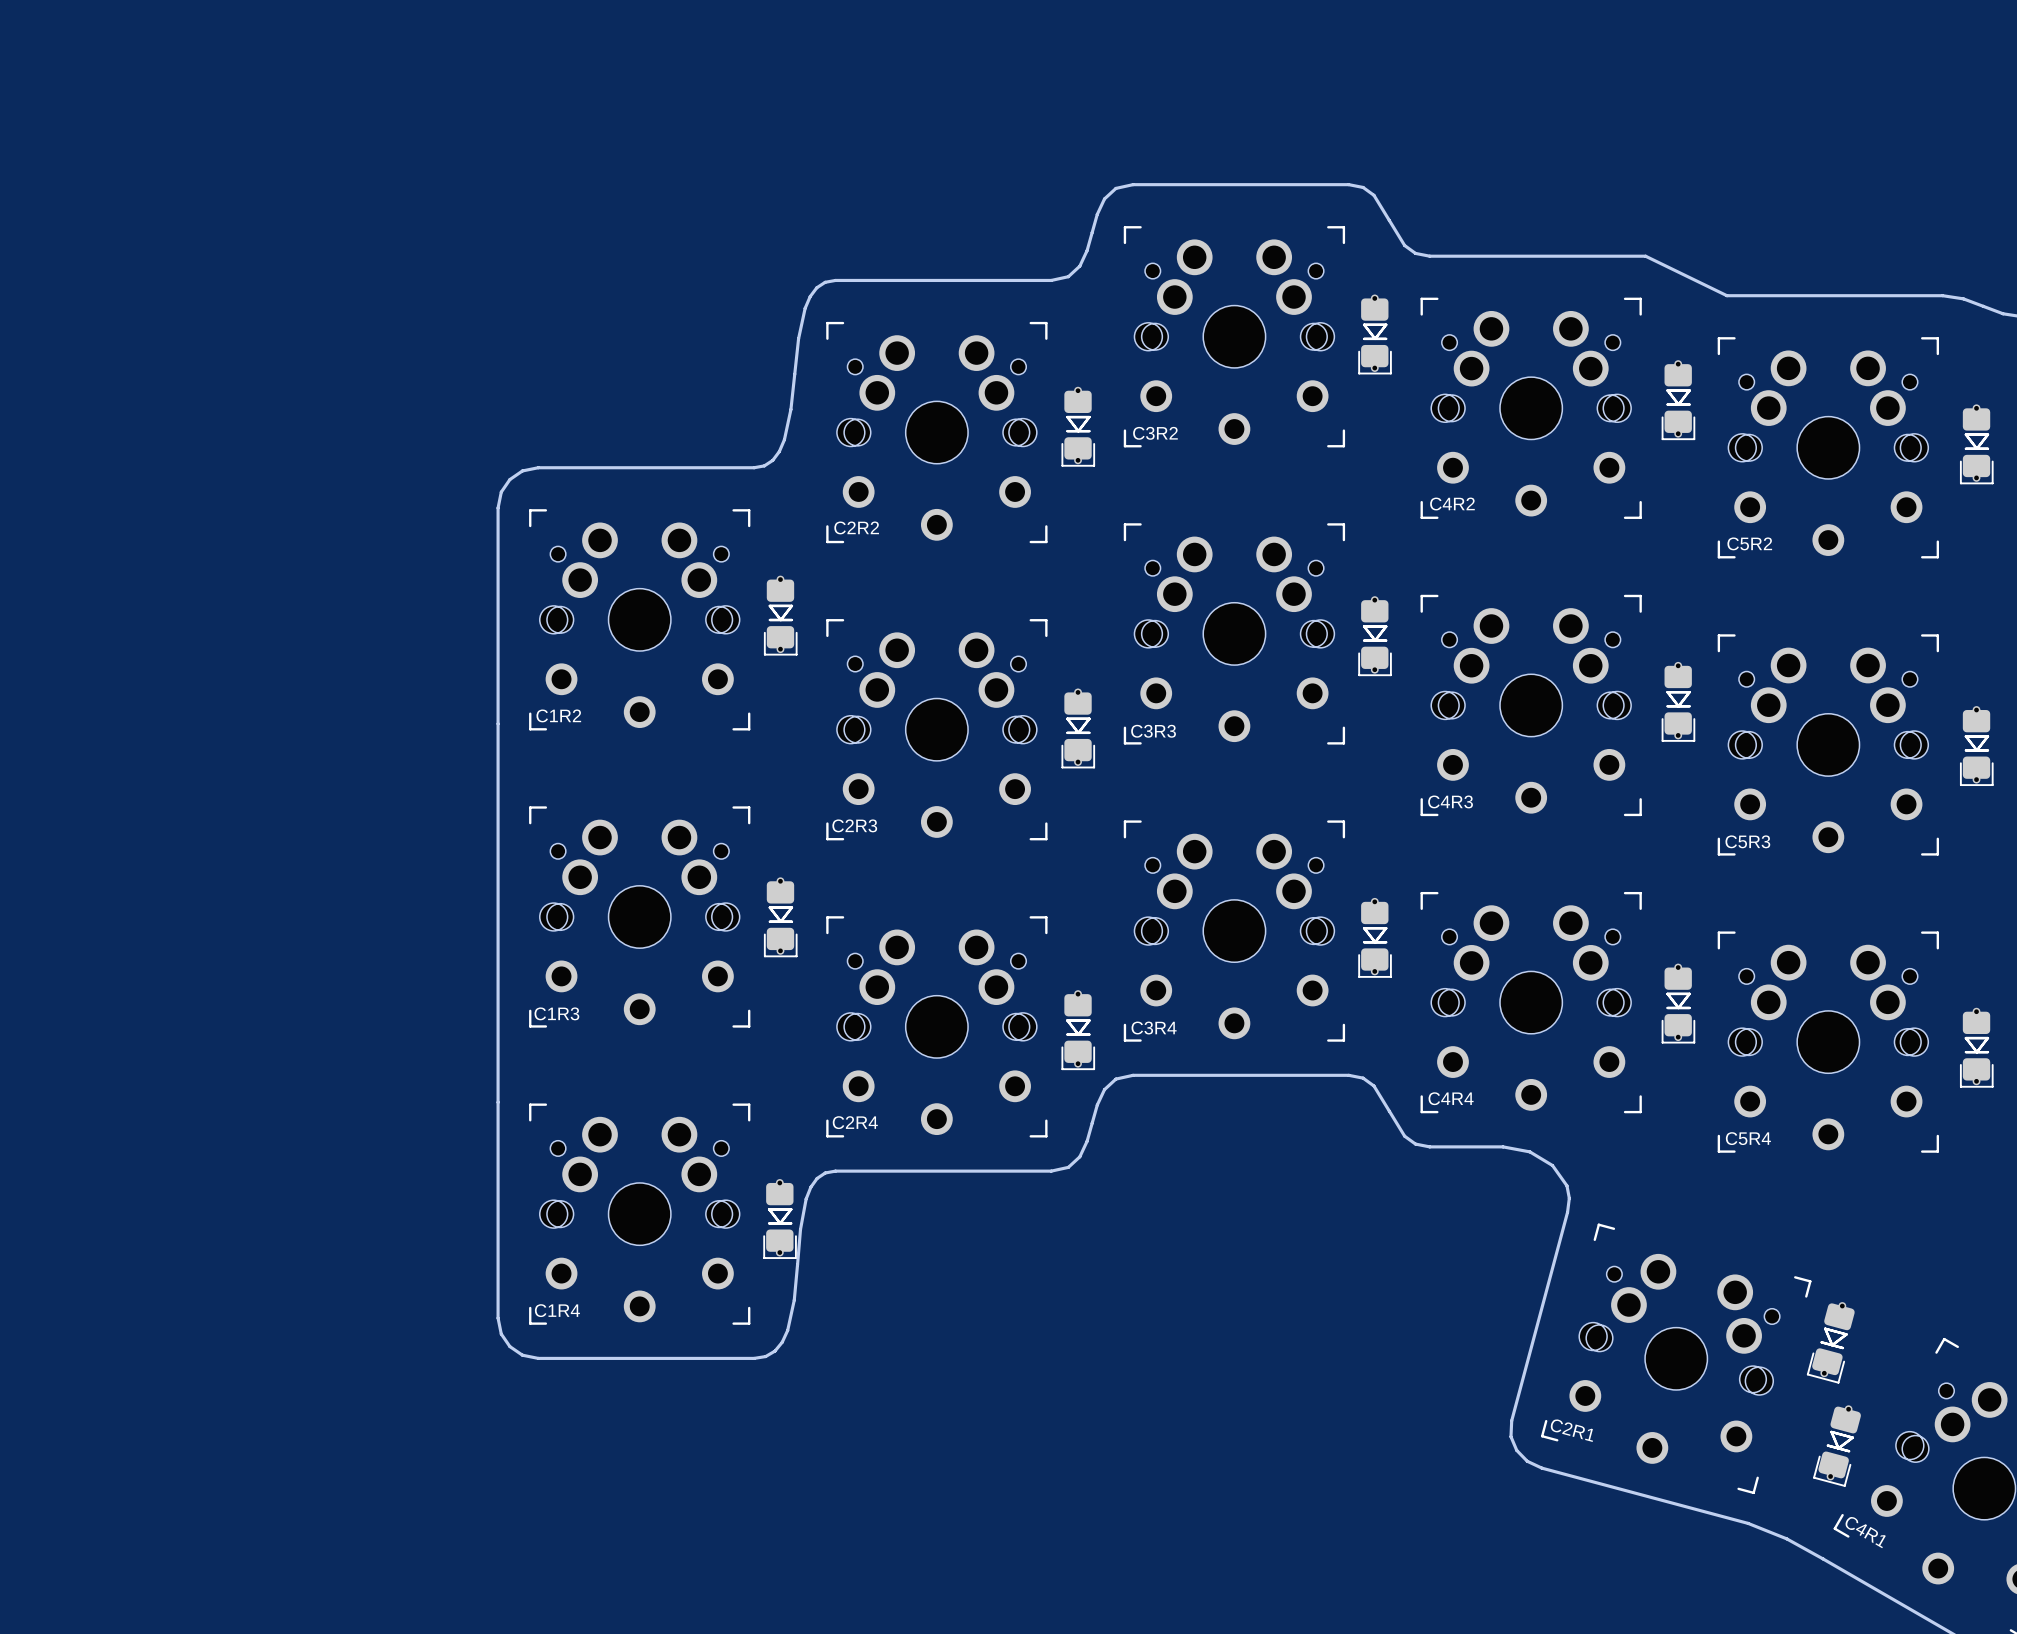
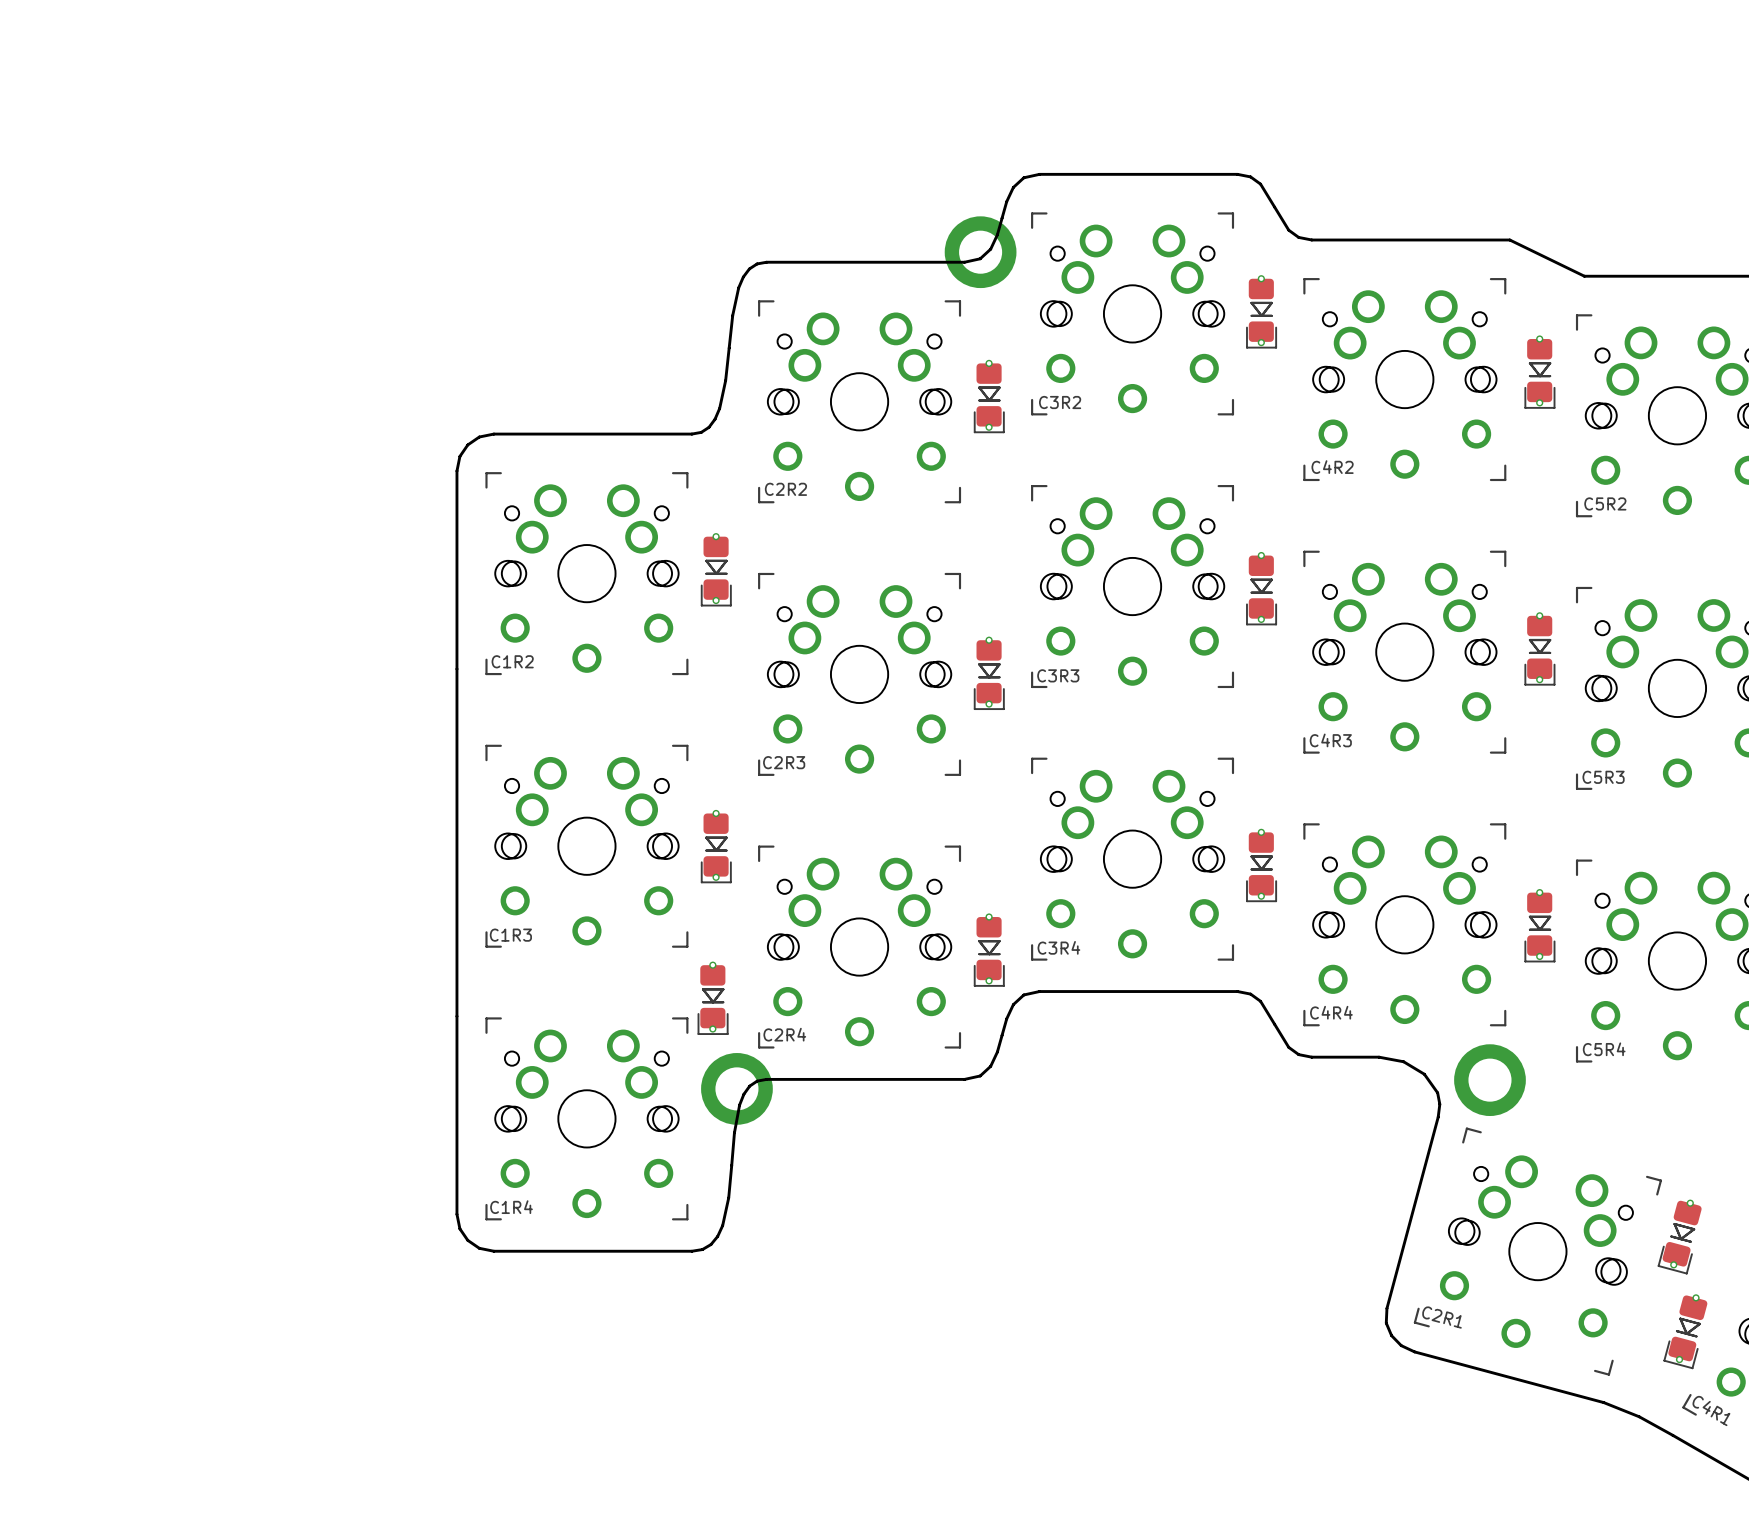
part: none -> (980, 252)
part: none -> (1489, 1080)
part: none -> (736, 1088)
part position: (780, 1219) -> (713, 998)

